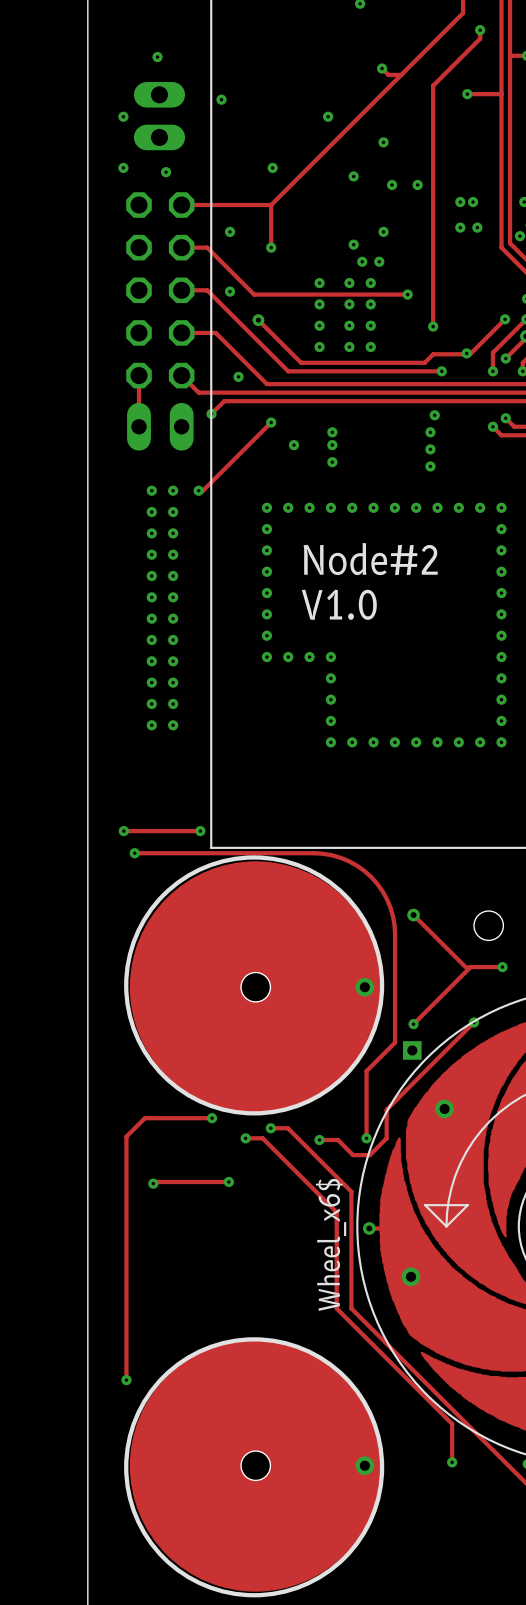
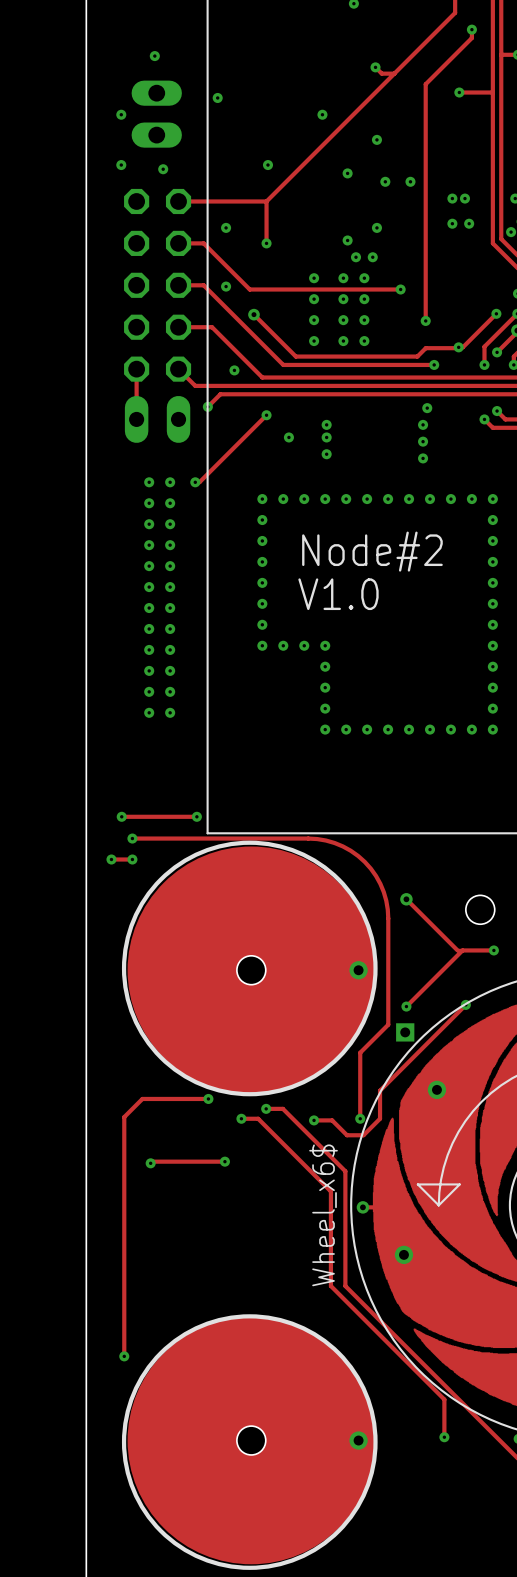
track: none -> (111, 859) (132, 859)
via: none -> (111, 859)
via: none -> (132, 859)

